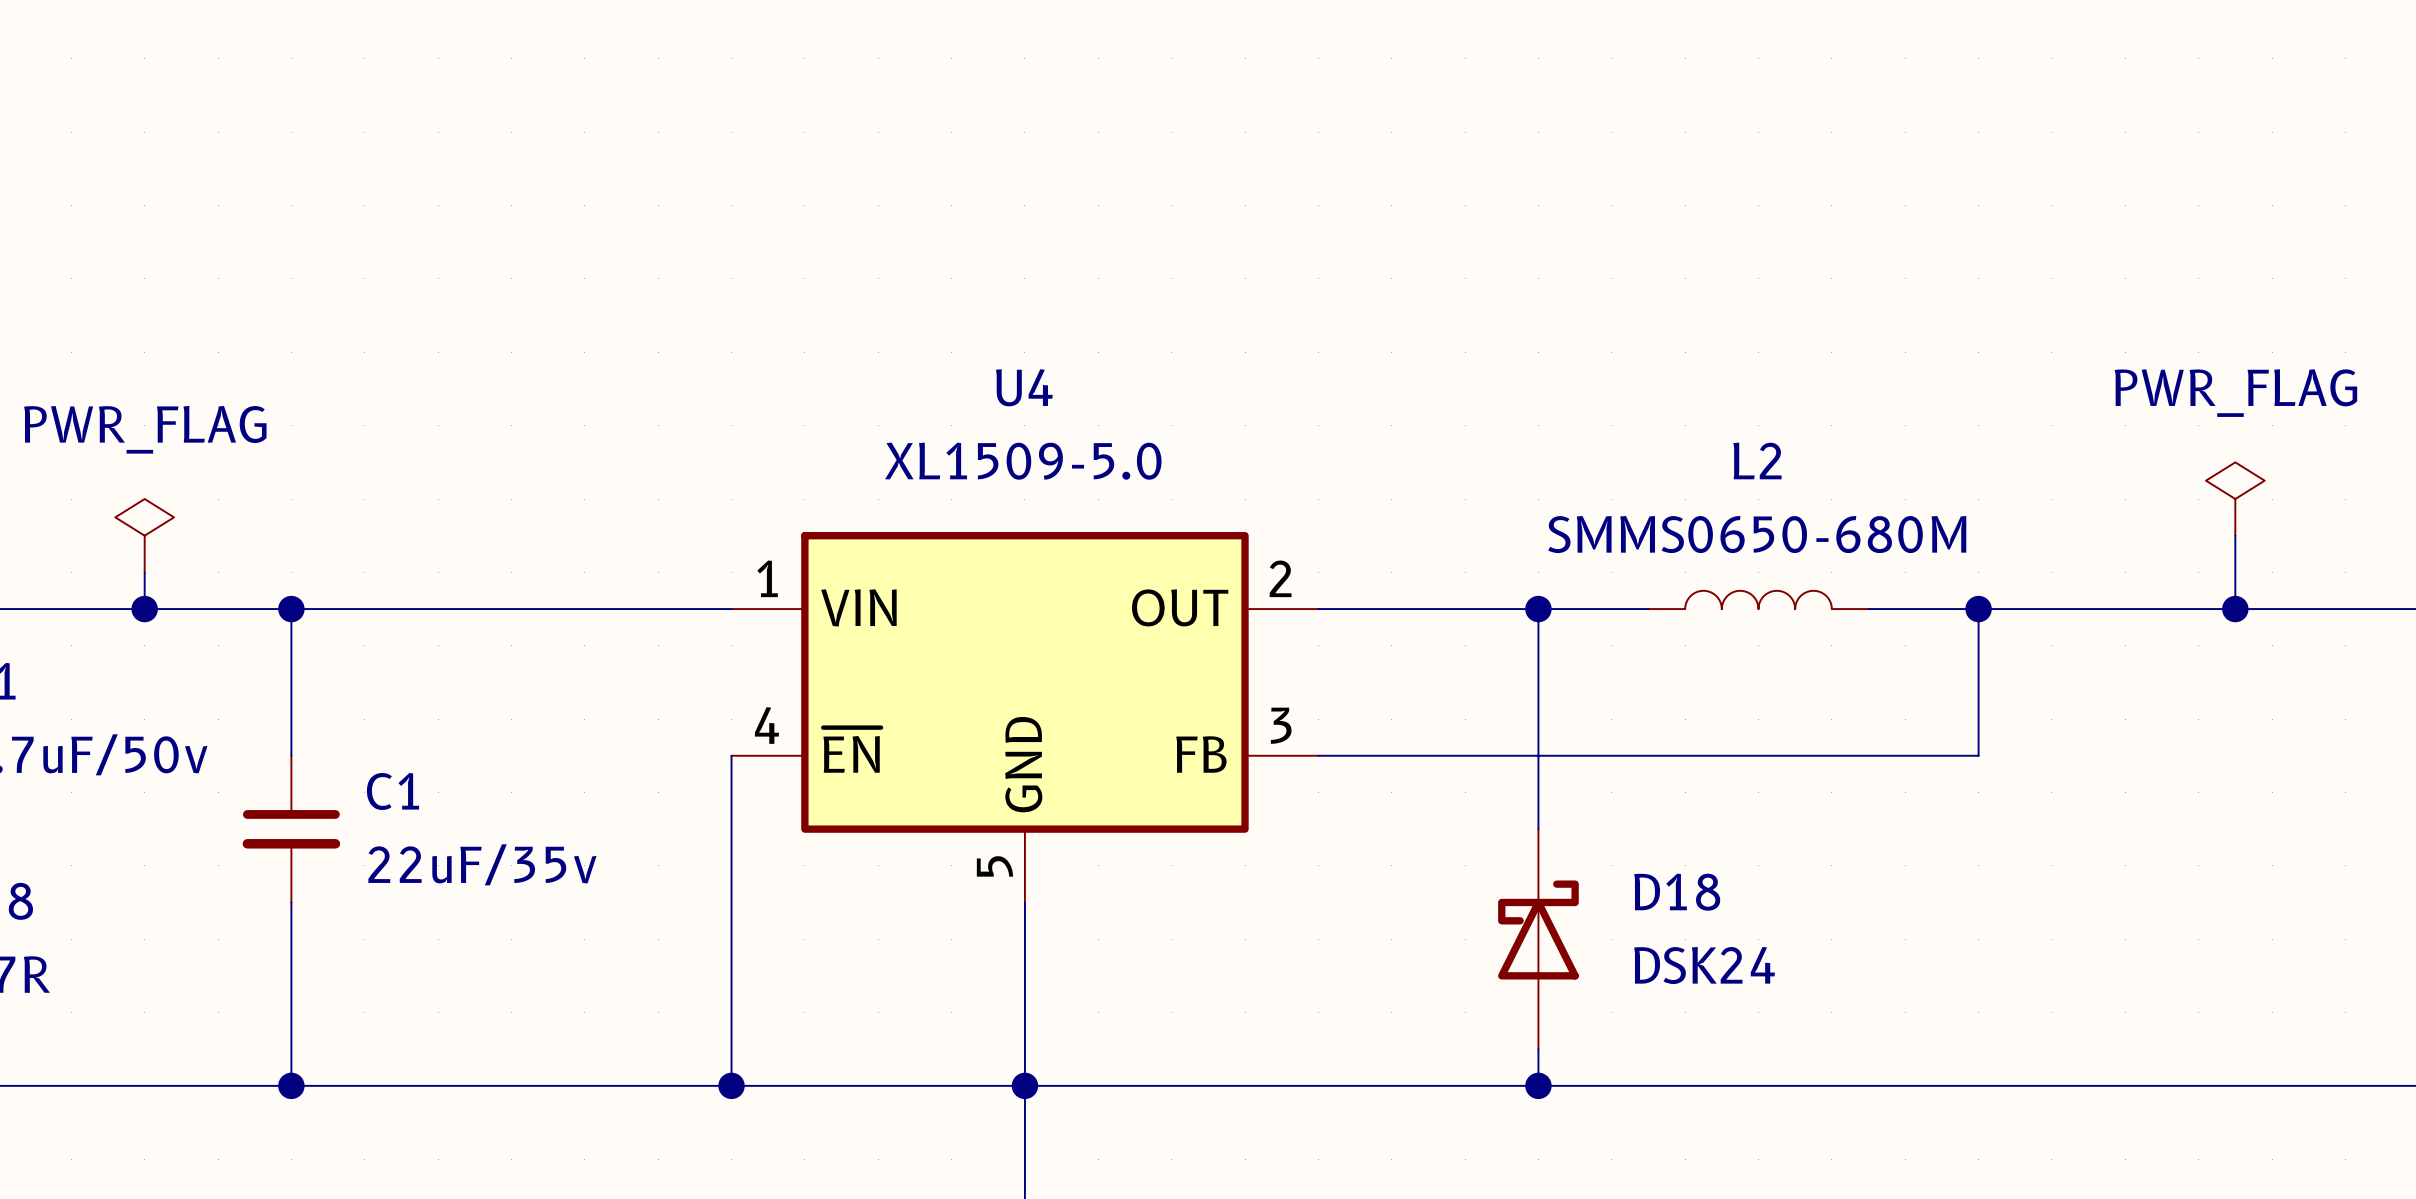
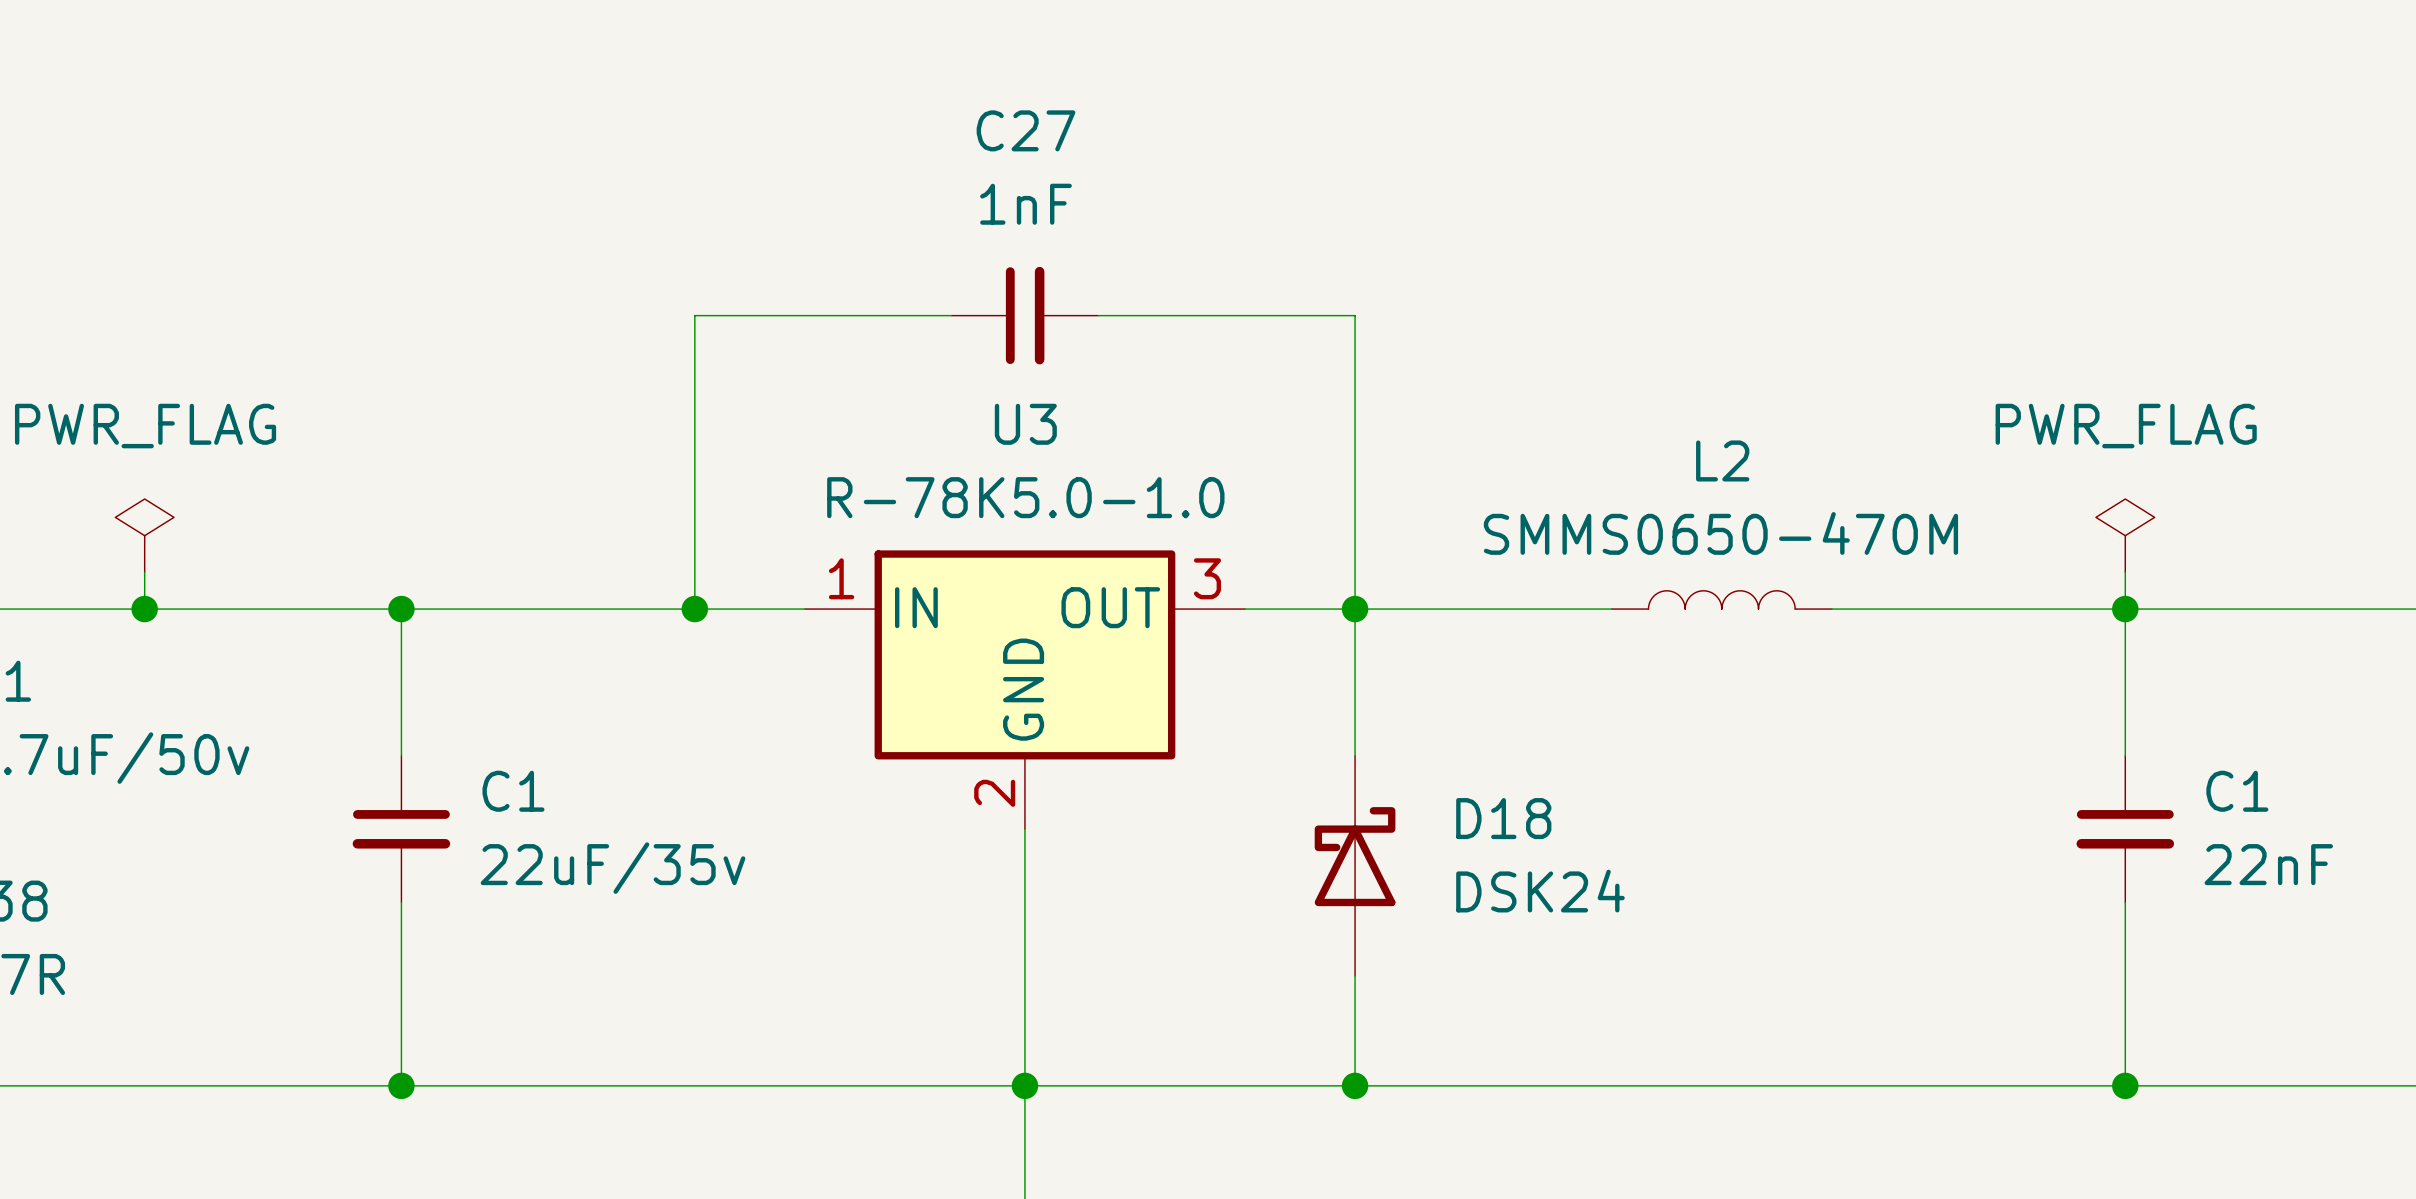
wire: none -> (951, 315) (694, 315) (694, 609)
C27: none -> 1nF (1024, 315)
wire: none -> (1098, 315) (1355, 315) (1355, 755)
power symbol position: PWR_FLAG (2235, 499) -> PWR_FLAG (2125, 535)
L2 value: SMMS0650-680M (1757, 534) -> SMMS0650-470M (1720, 533)
wire: (2235, 535) (2235, 609) -> none
wire: none -> (2125, 572) (2125, 755)
L2 position: (1758, 599) -> (1721, 599)
wire: (291, 609) (291, 755) -> (401, 609) (401, 755)
junction position: (291, 609) -> (401, 609)
junction: none -> (694, 609)
junction: none -> (1355, 609)
wire: (1538, 609) (1538, 829) -> none
junction: (1538, 609) -> none
wire: (1978, 609) (1978, 755) (1318, 755) -> none
junction: (1978, 609) -> none
junction: none -> (2125, 609)
junction: (2235, 609) -> none
U3: none -> R-78K5.0-1.0 (1024, 689)
U4: XL1509-5.0 (1024, 717) -> none
wire: (731, 755) (731, 1085) -> none
C1 position: (291, 829) -> (401, 829)
C1: none -> 22nF (2125, 829)
wire: (291, 902) (291, 1085) -> (401, 902) (401, 1085)
wire: none -> (2125, 902) (2125, 1085)
D18 position: (1538, 939) -> (1355, 865)
wire: none -> (1355, 975) (1355, 1085)
wire: (1538, 1049) (1538, 1085) -> none
junction position: (291, 1085) -> (401, 1085)
junction: (731, 1085) -> none
junction: none -> (1355, 1085)
junction: (1538, 1085) -> none
junction: none -> (2125, 1085)

